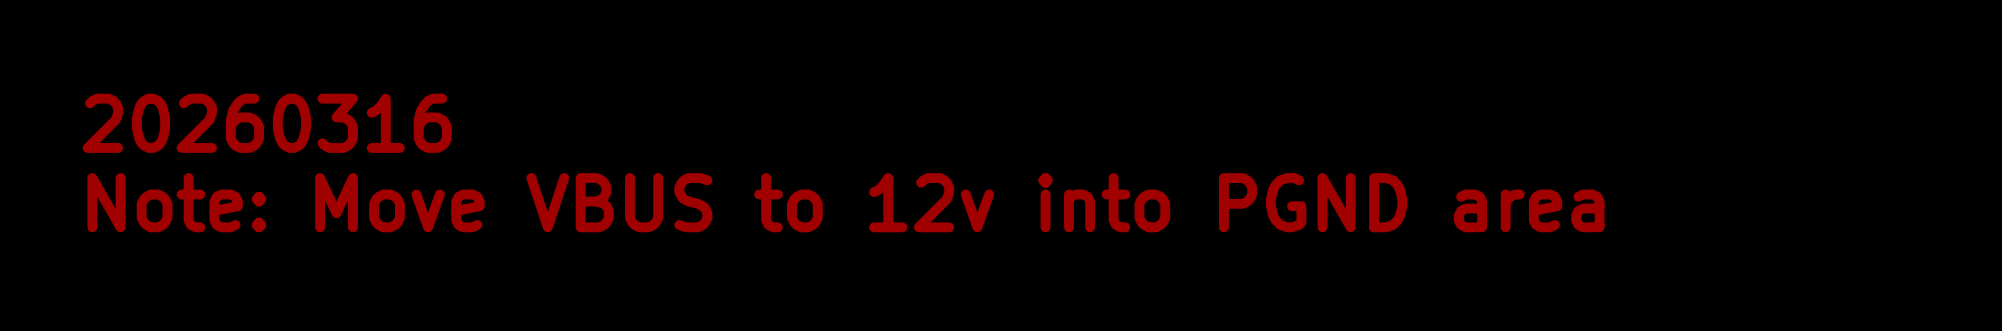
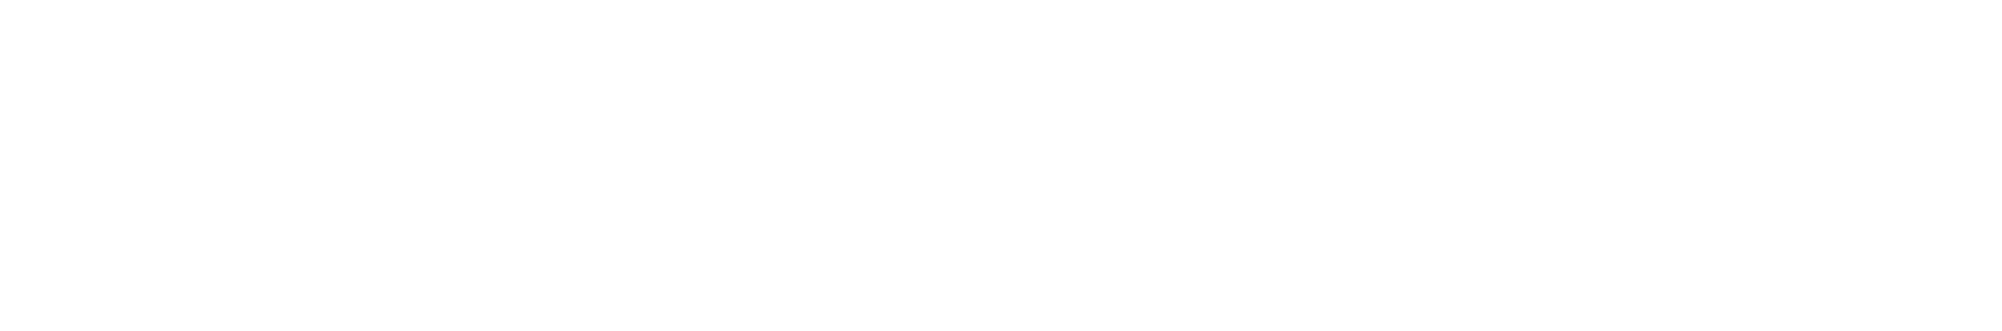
text: 20260316 (267, 123) -> none
text: Note: Move VBUS to 12v into PGND area (845, 202) -> none

